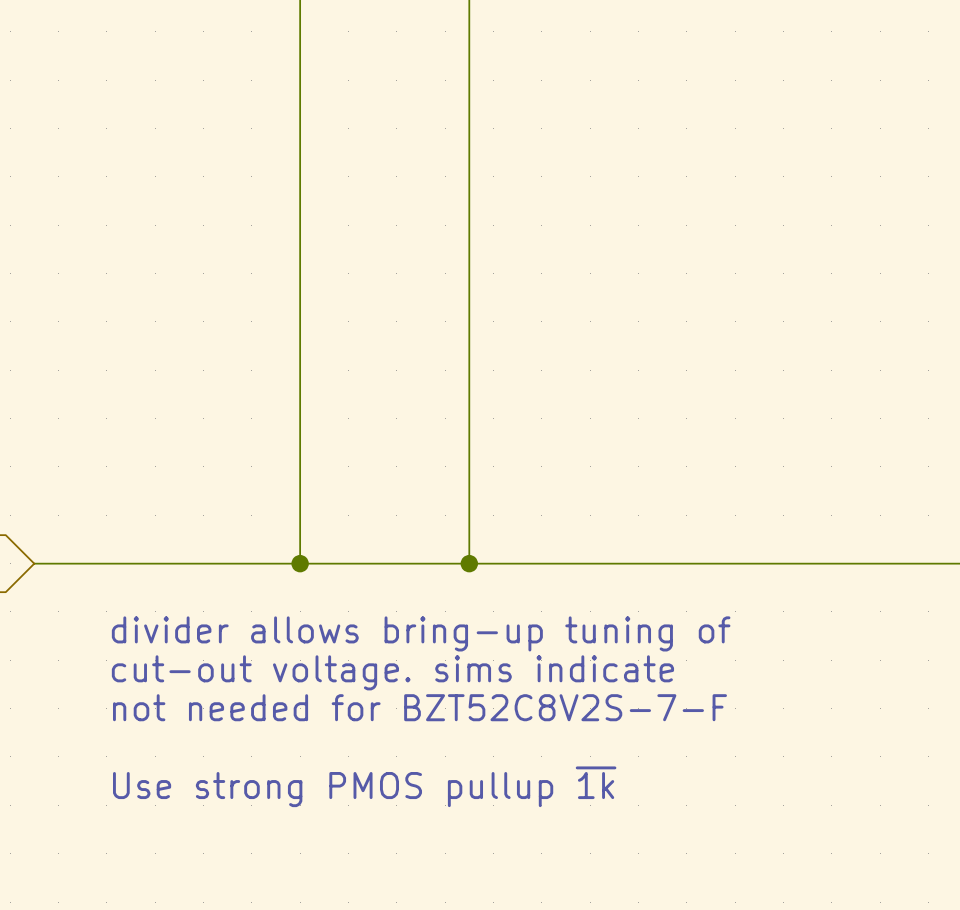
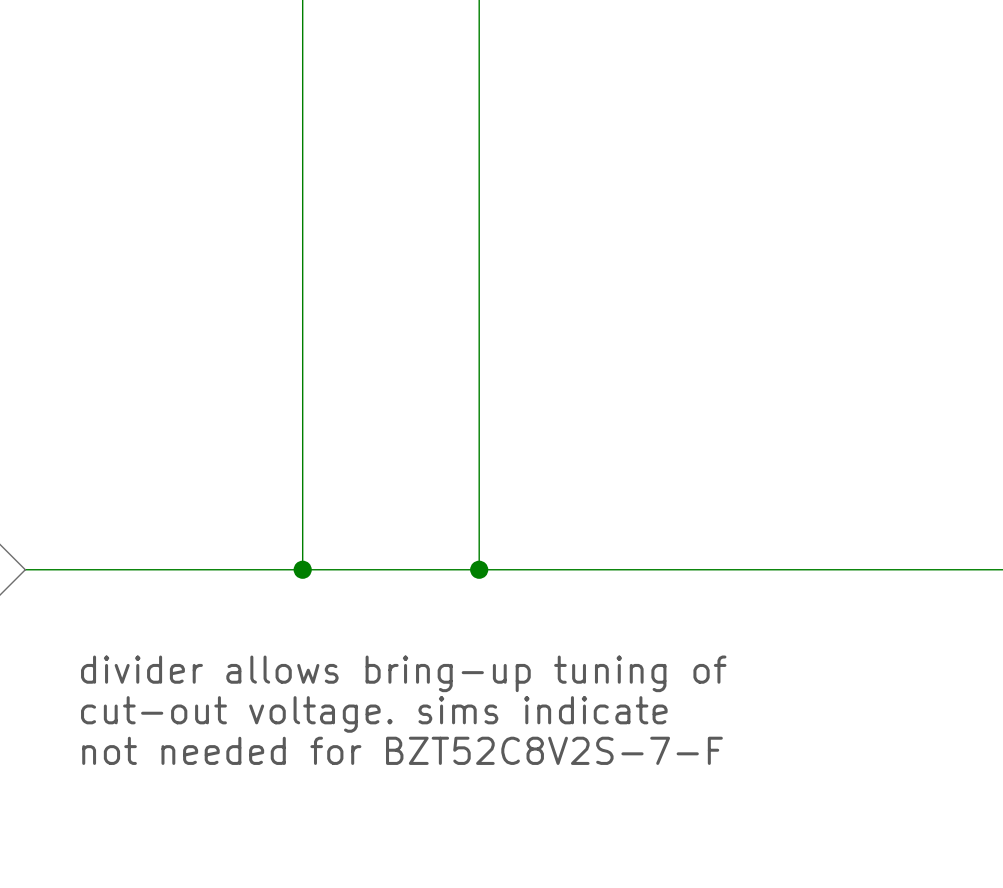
text position: divider allows bring-up tuning of (421, 633) -> divider allows bring-up tuning of (403, 673)
text position: cut-out voltage. sims indicate (392, 672) -> cut-out voltage. sims indicate (374, 714)
text position: not needed for BZT52C8V2S-7-F (419, 707) -> not needed for BZT52C8V2S-7-F (402, 750)
text: Use strong PMOS pullup ~{1k} (364, 786) -> none

